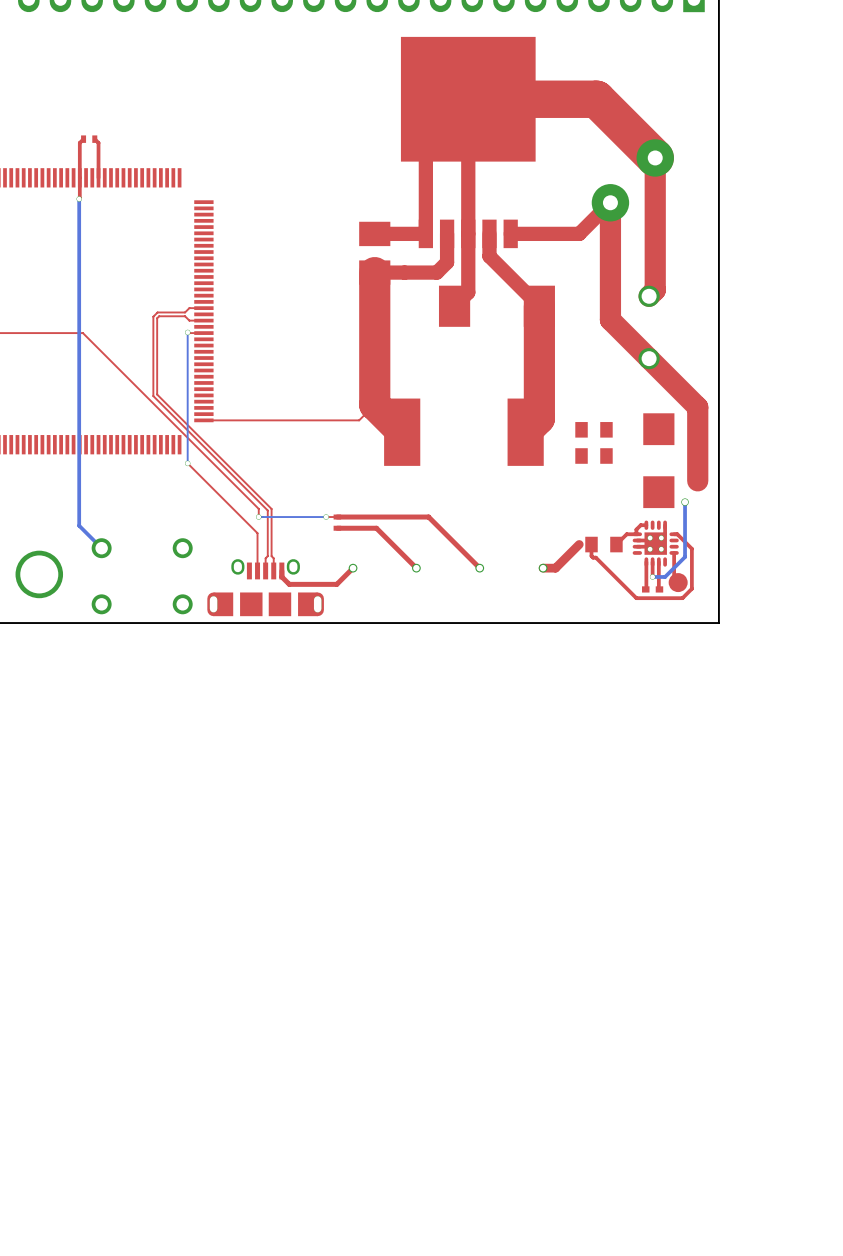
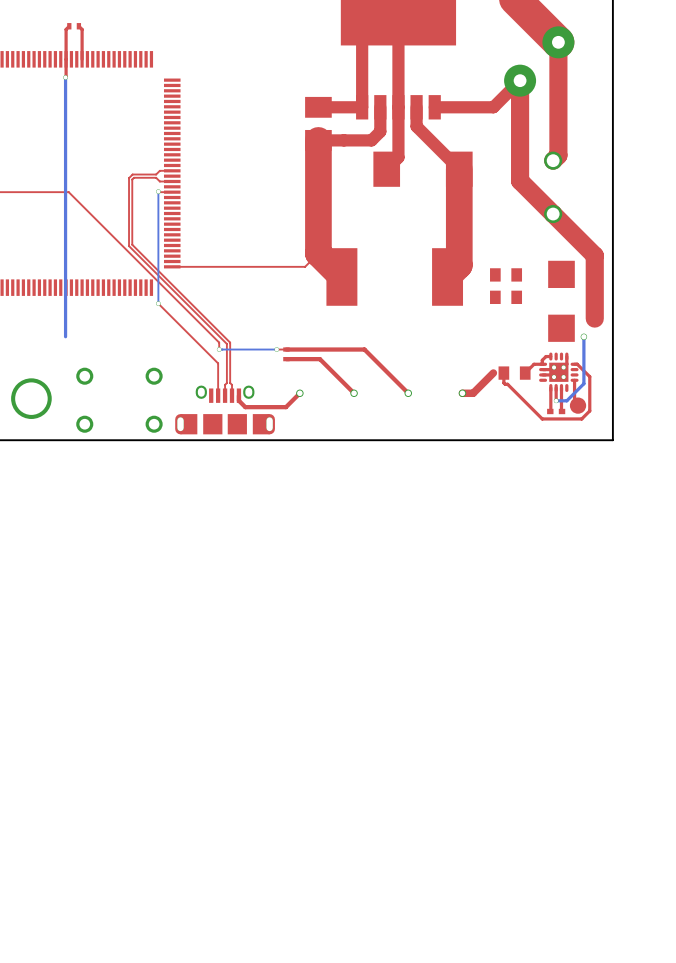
bottom track: (79, 502) (79, 525) (101, 548) -> none

